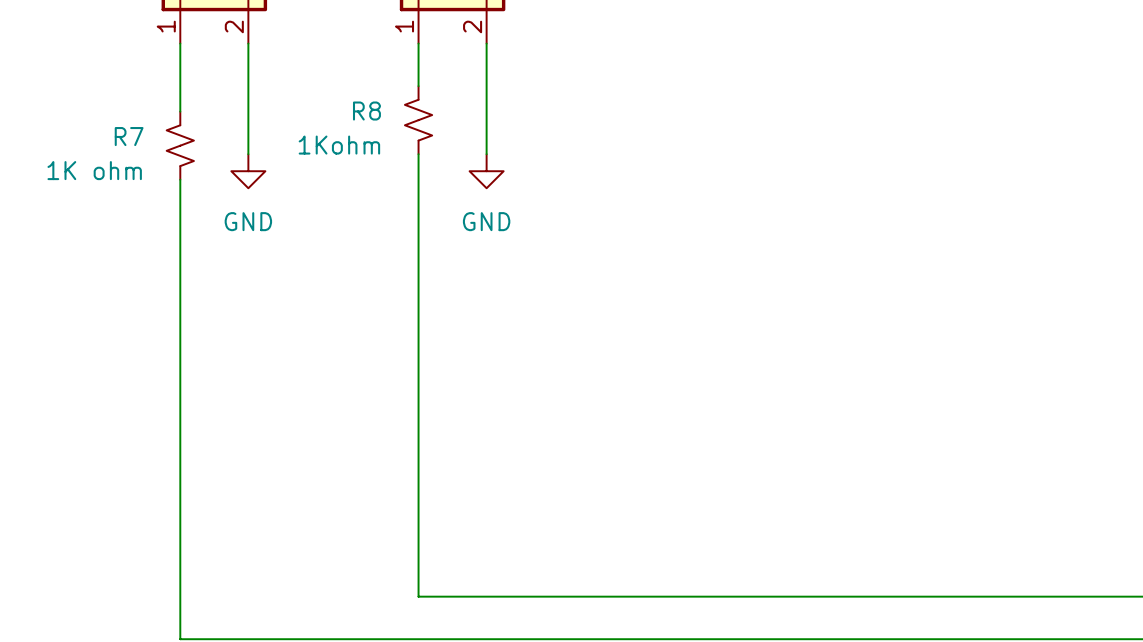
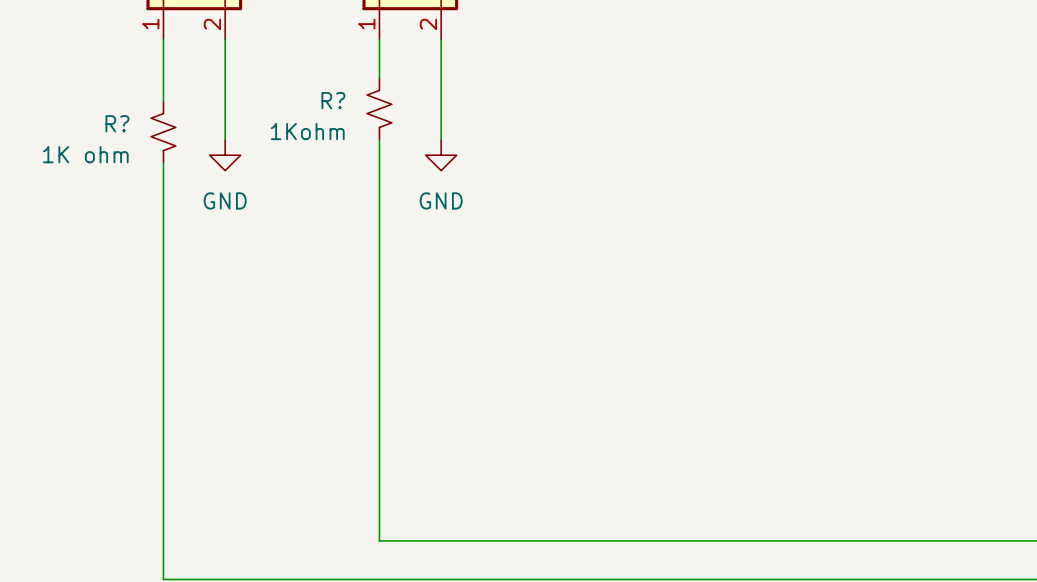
R8 name: R8 (366, 111) -> R? (333, 100)
R7 name: R7 (129, 136) -> R? (117, 123)

